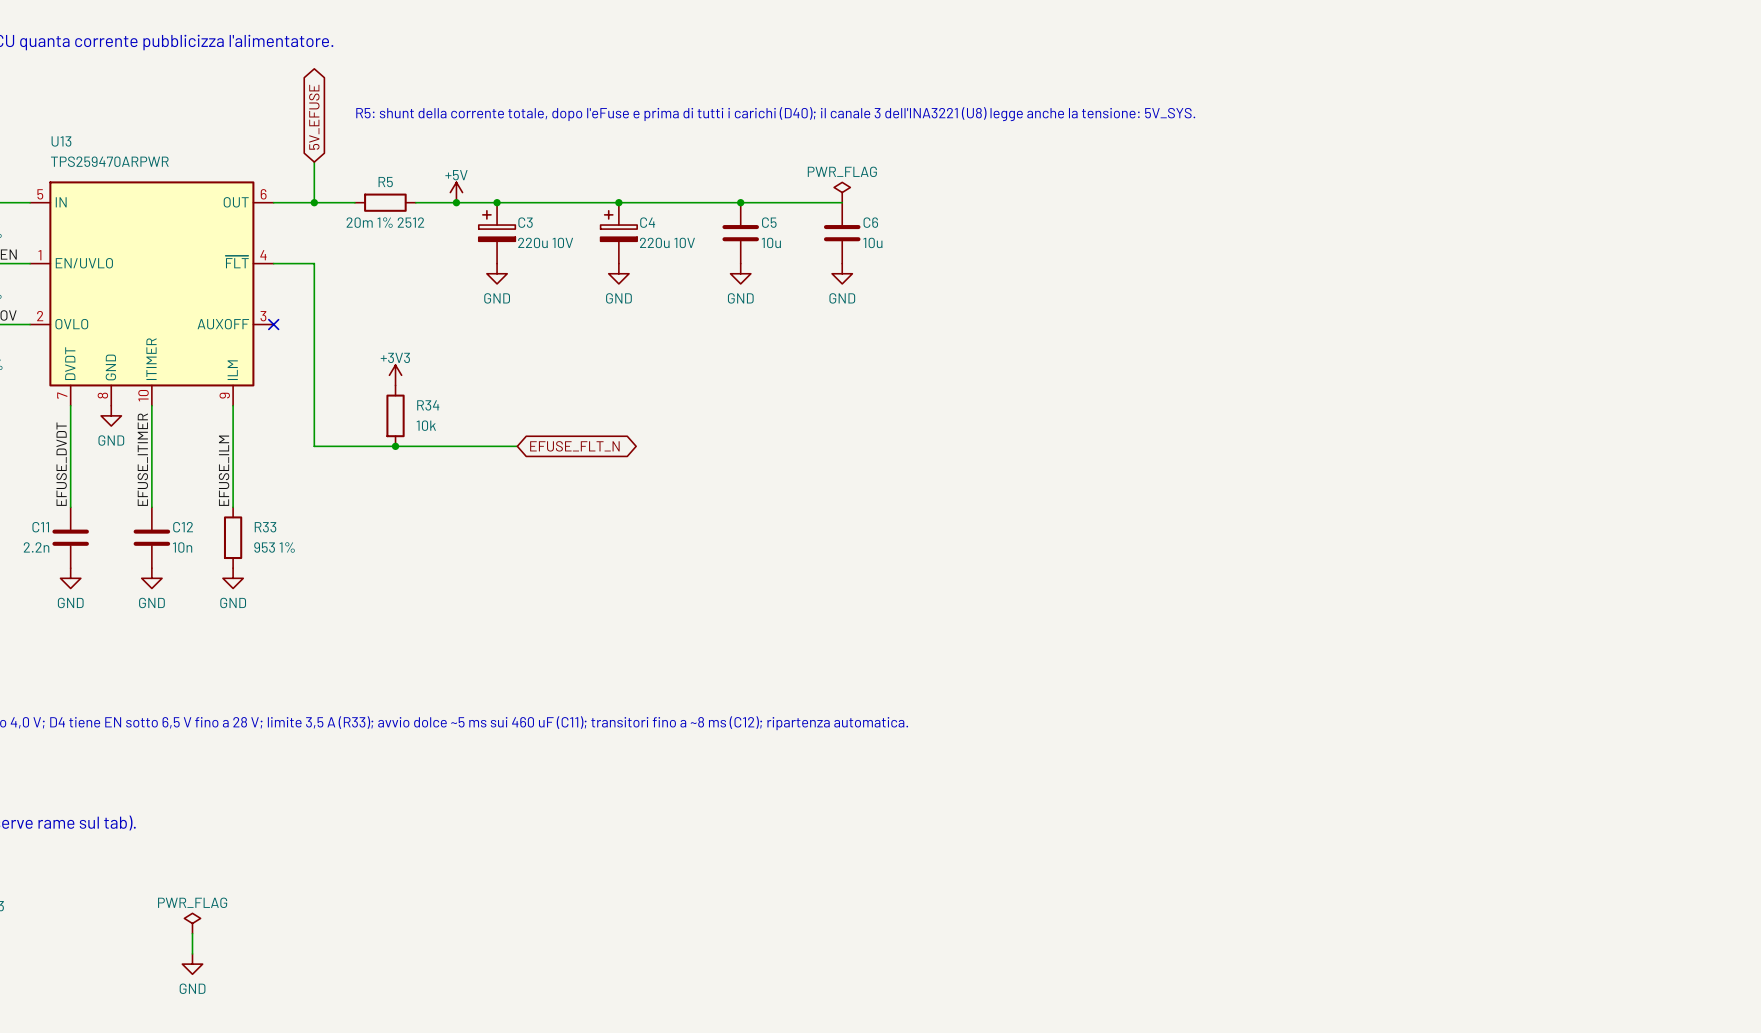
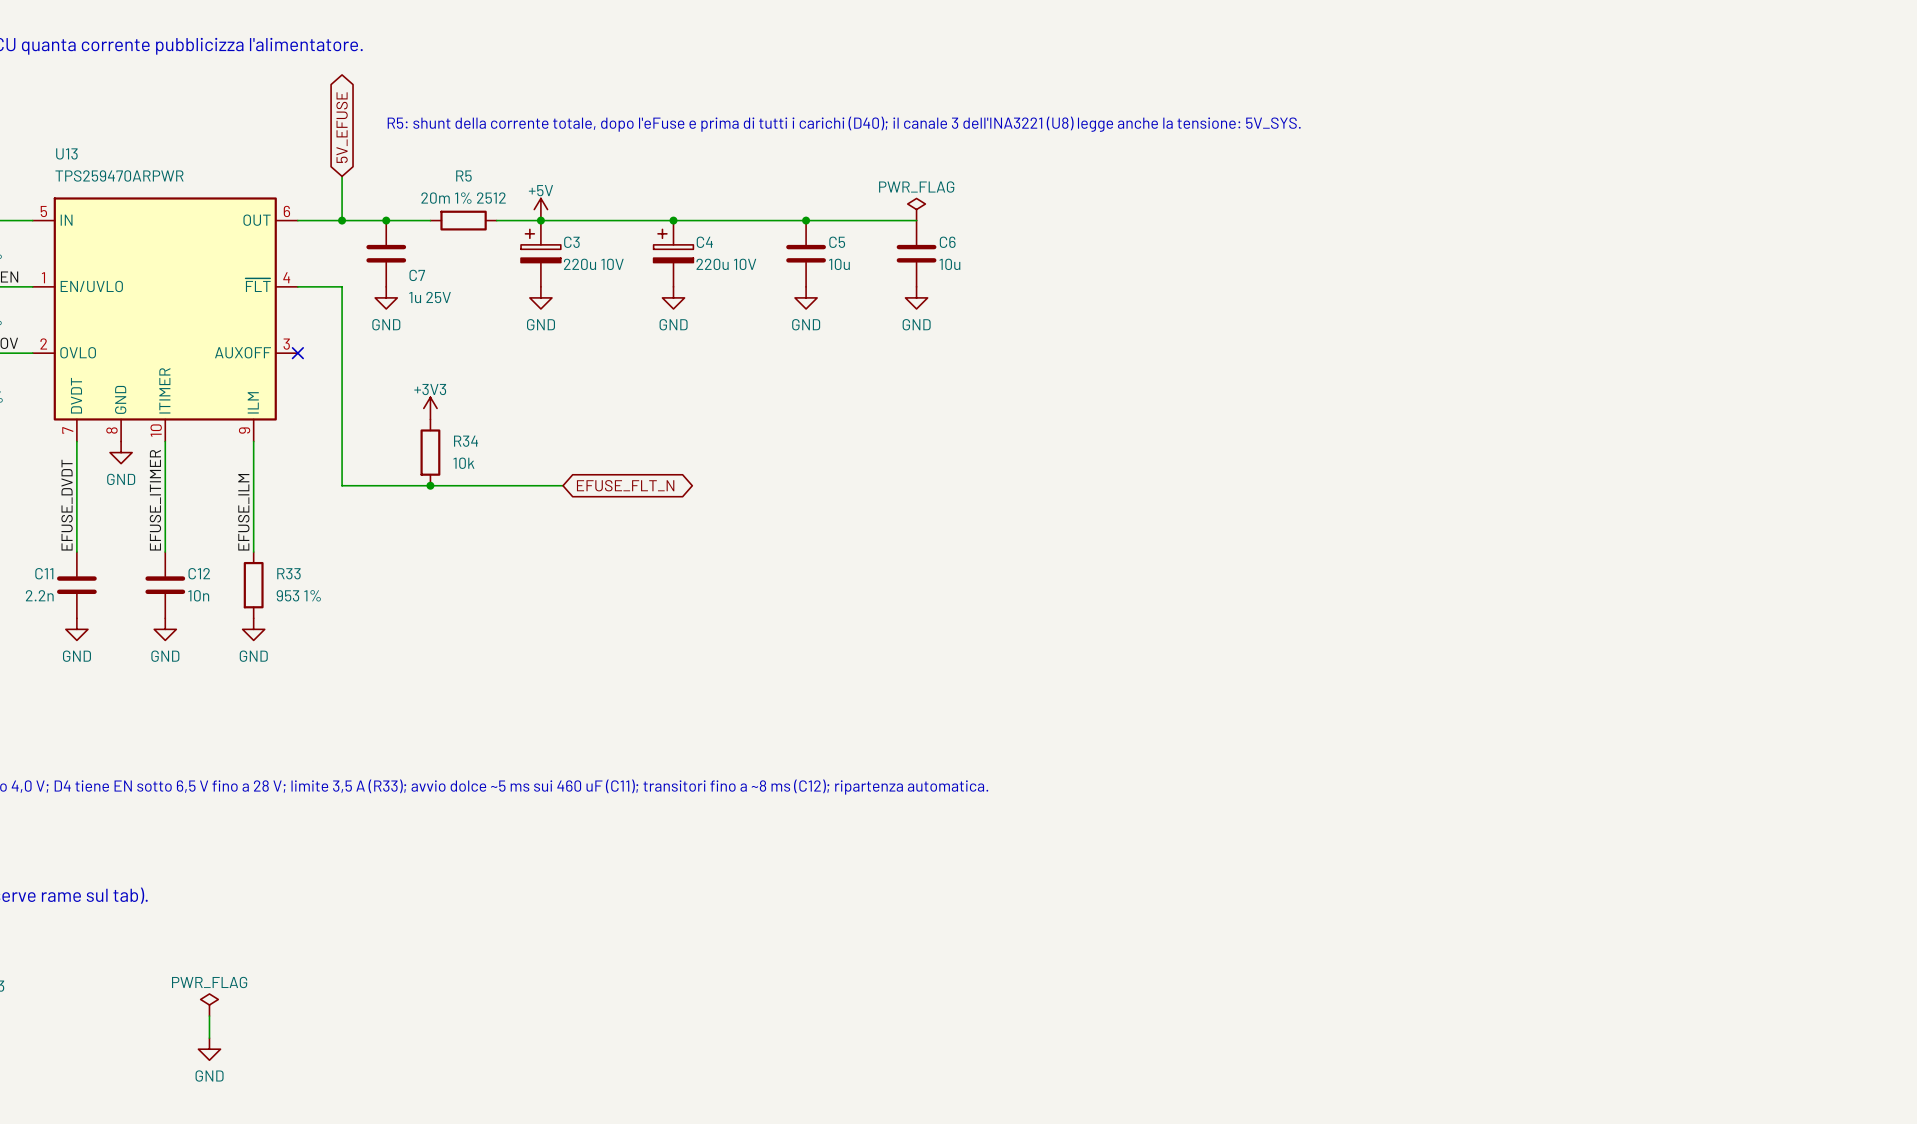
R5 name position: R5 (385, 182) -> R5 (463, 176)
power symbol position: +5V (456, 192) -> +5V (540, 209)
junction: none -> (386, 220)
R5 position: (385, 202) -> (463, 220)
wire: (415, 202) (456, 202) -> (386, 220) (430, 220)
junction: (456, 202) -> none
R5 value position: 20m 1% 2512 (385, 222) -> 20m 1% 2512 (463, 198)
C7: none -> 1u 25V (386, 253)
power symbol: none -> GND (386, 297)

